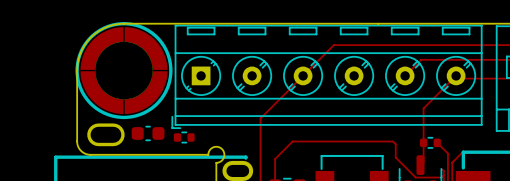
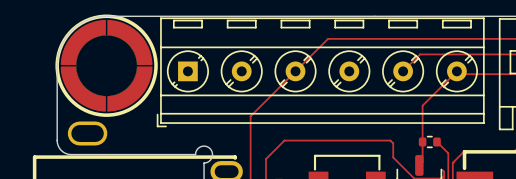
part: (148, 133) -> none
part: (184, 137) -> none

